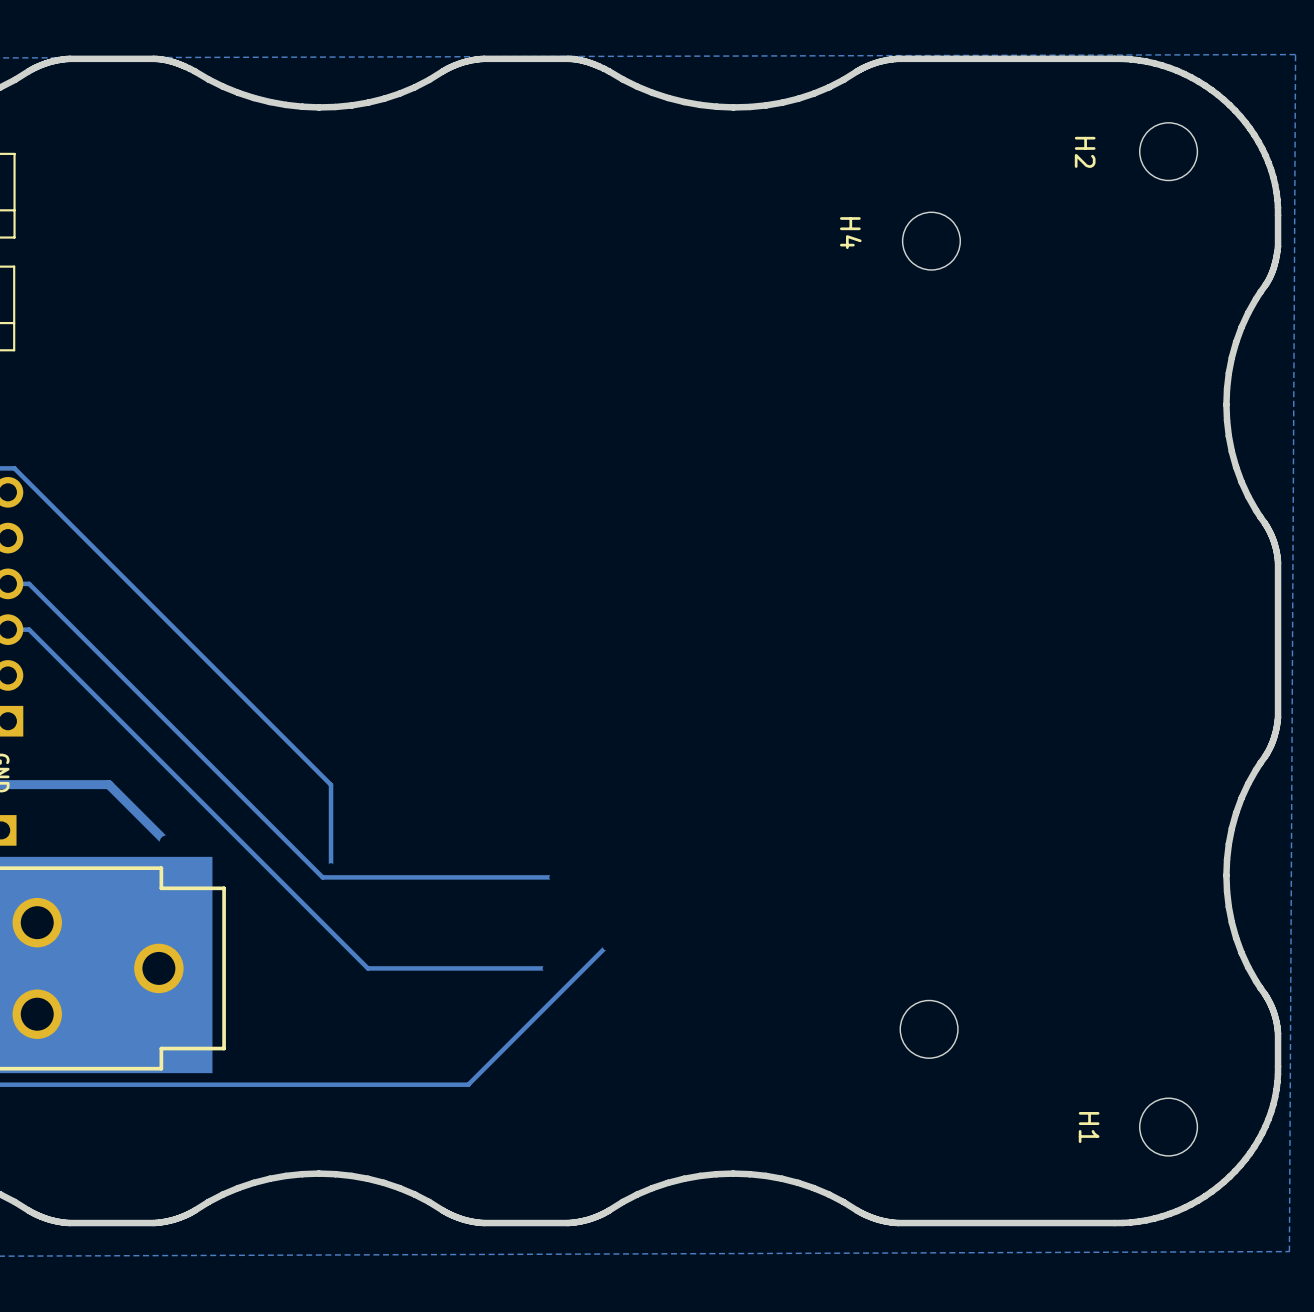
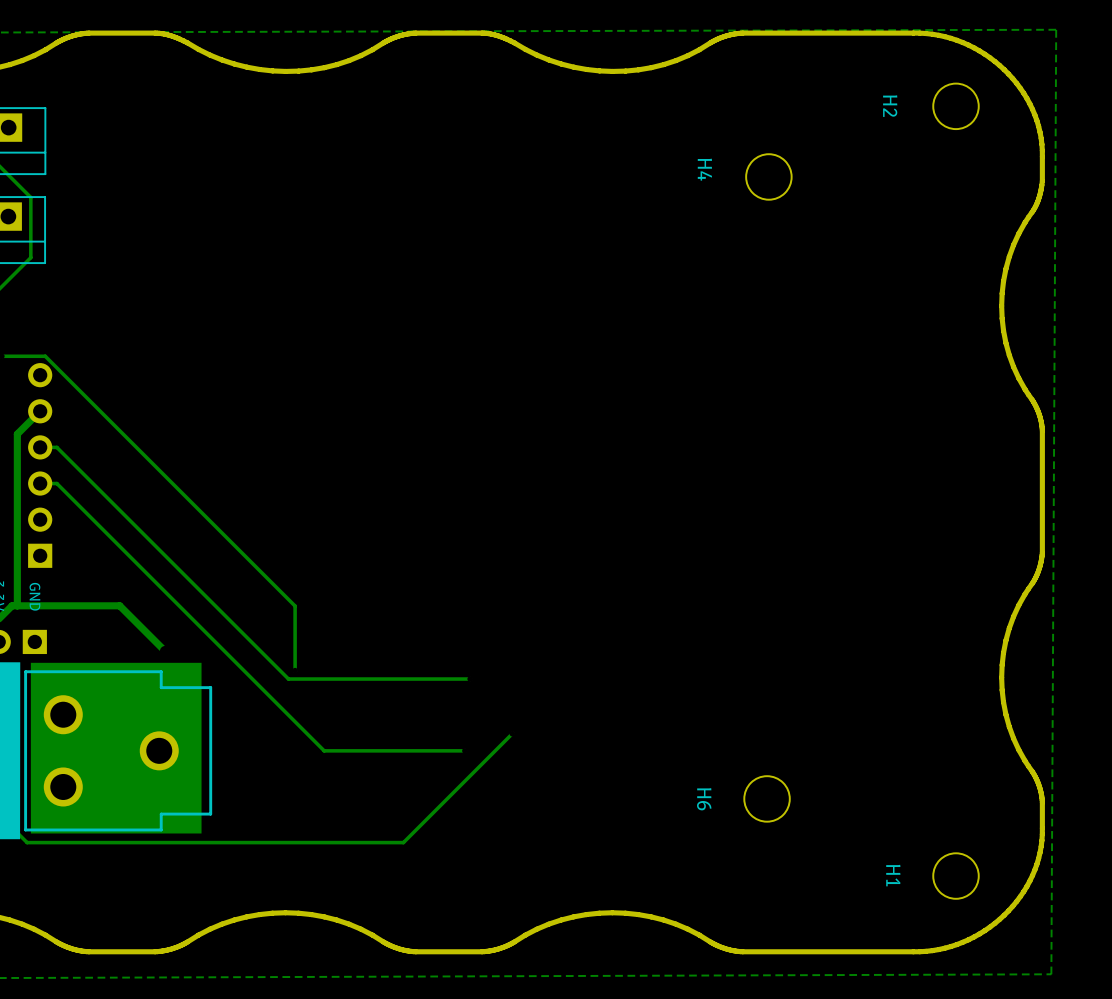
H6 name: none -> H6 (704, 799)

